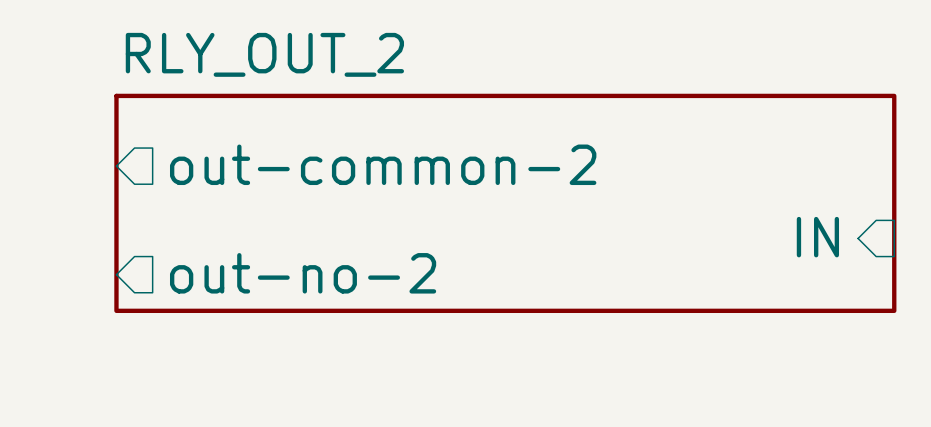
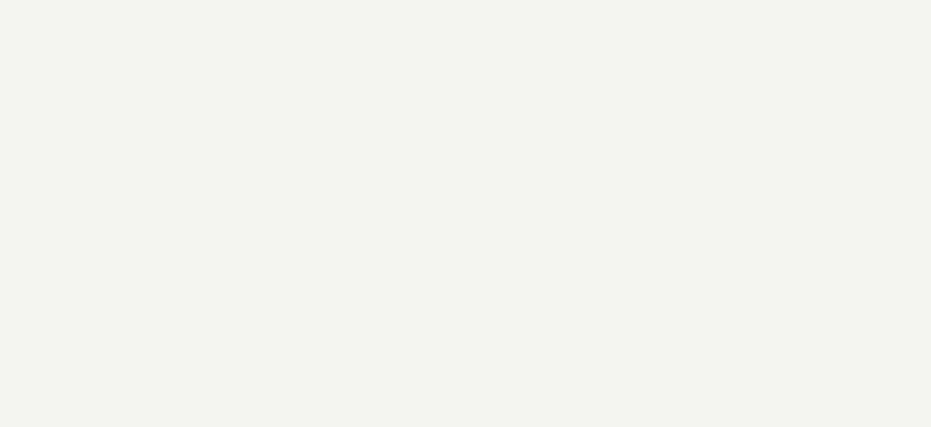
sheet pin: out-common-2 (383, 164) -> none
sheet RLY_OUT_2: (505, 203) -> none
sheet pin: IN (817, 237) -> none
sheet pin: out-no-2 (303, 273) -> none

